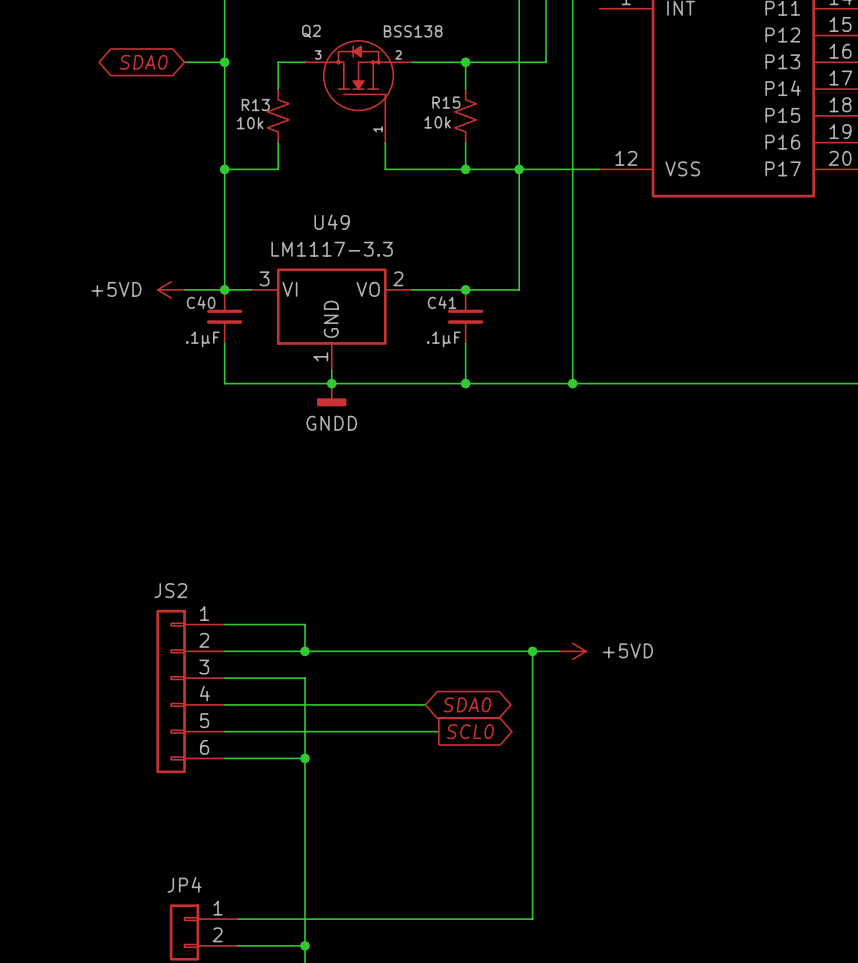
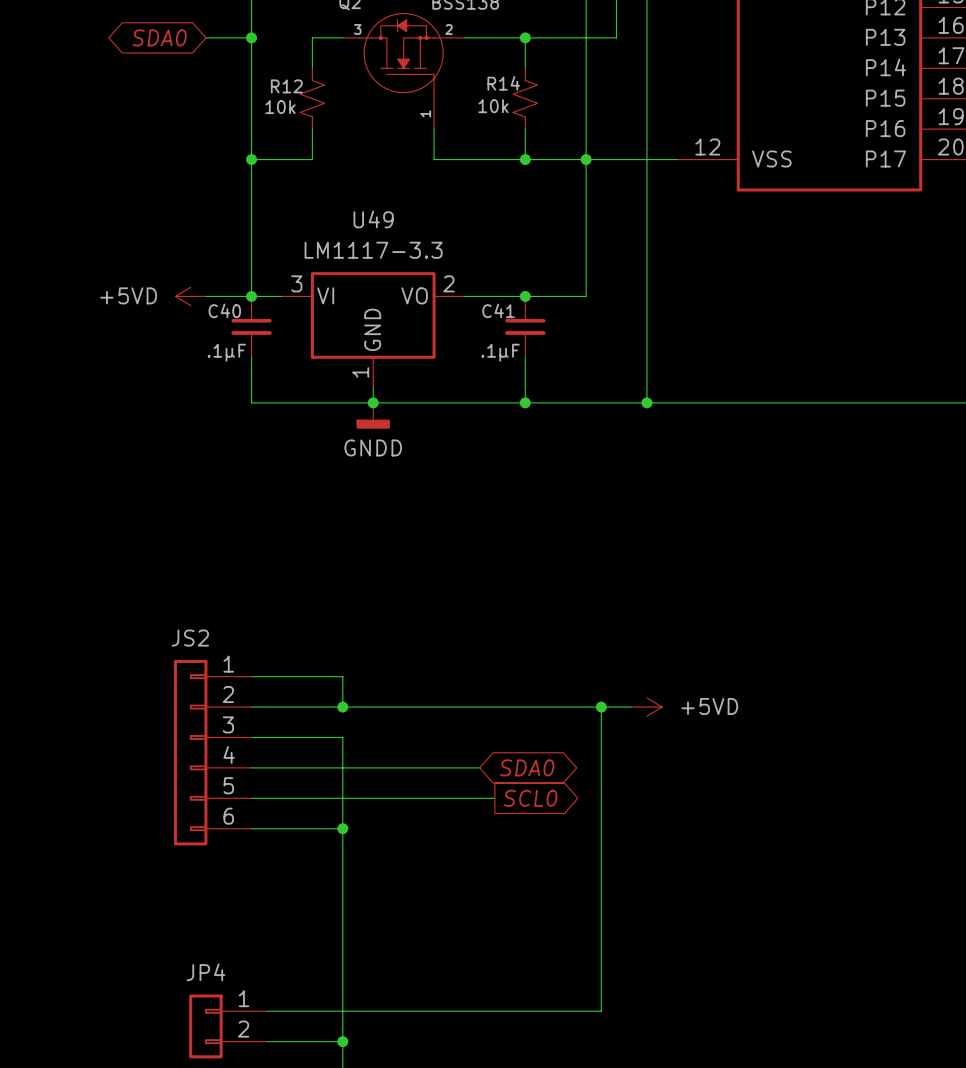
R15 name: R15 (446, 102) -> R14 (503, 83)
R13 name: R13 (255, 105) -> R12 (286, 86)

